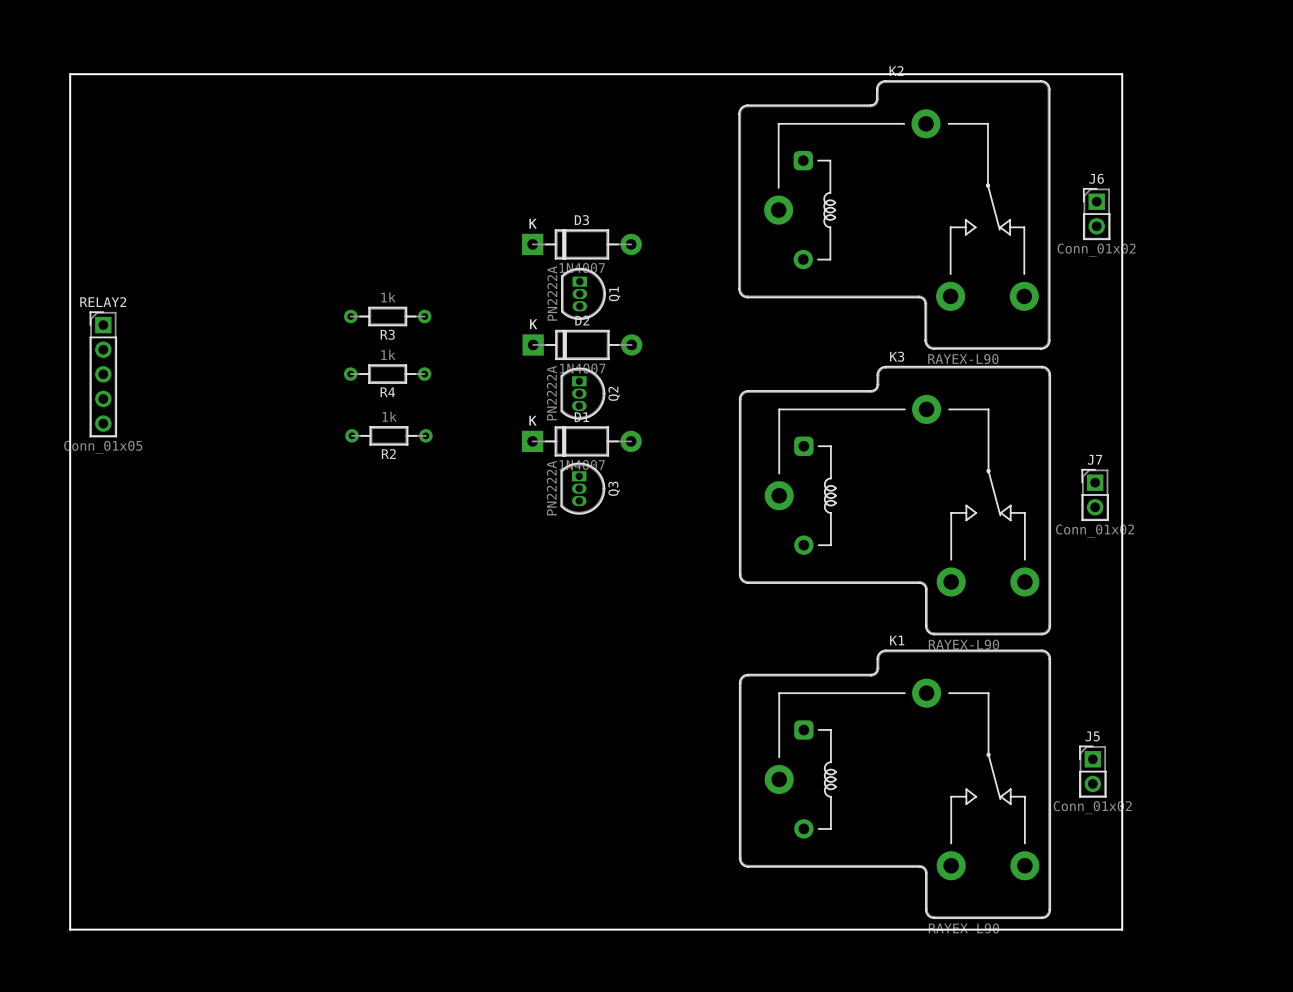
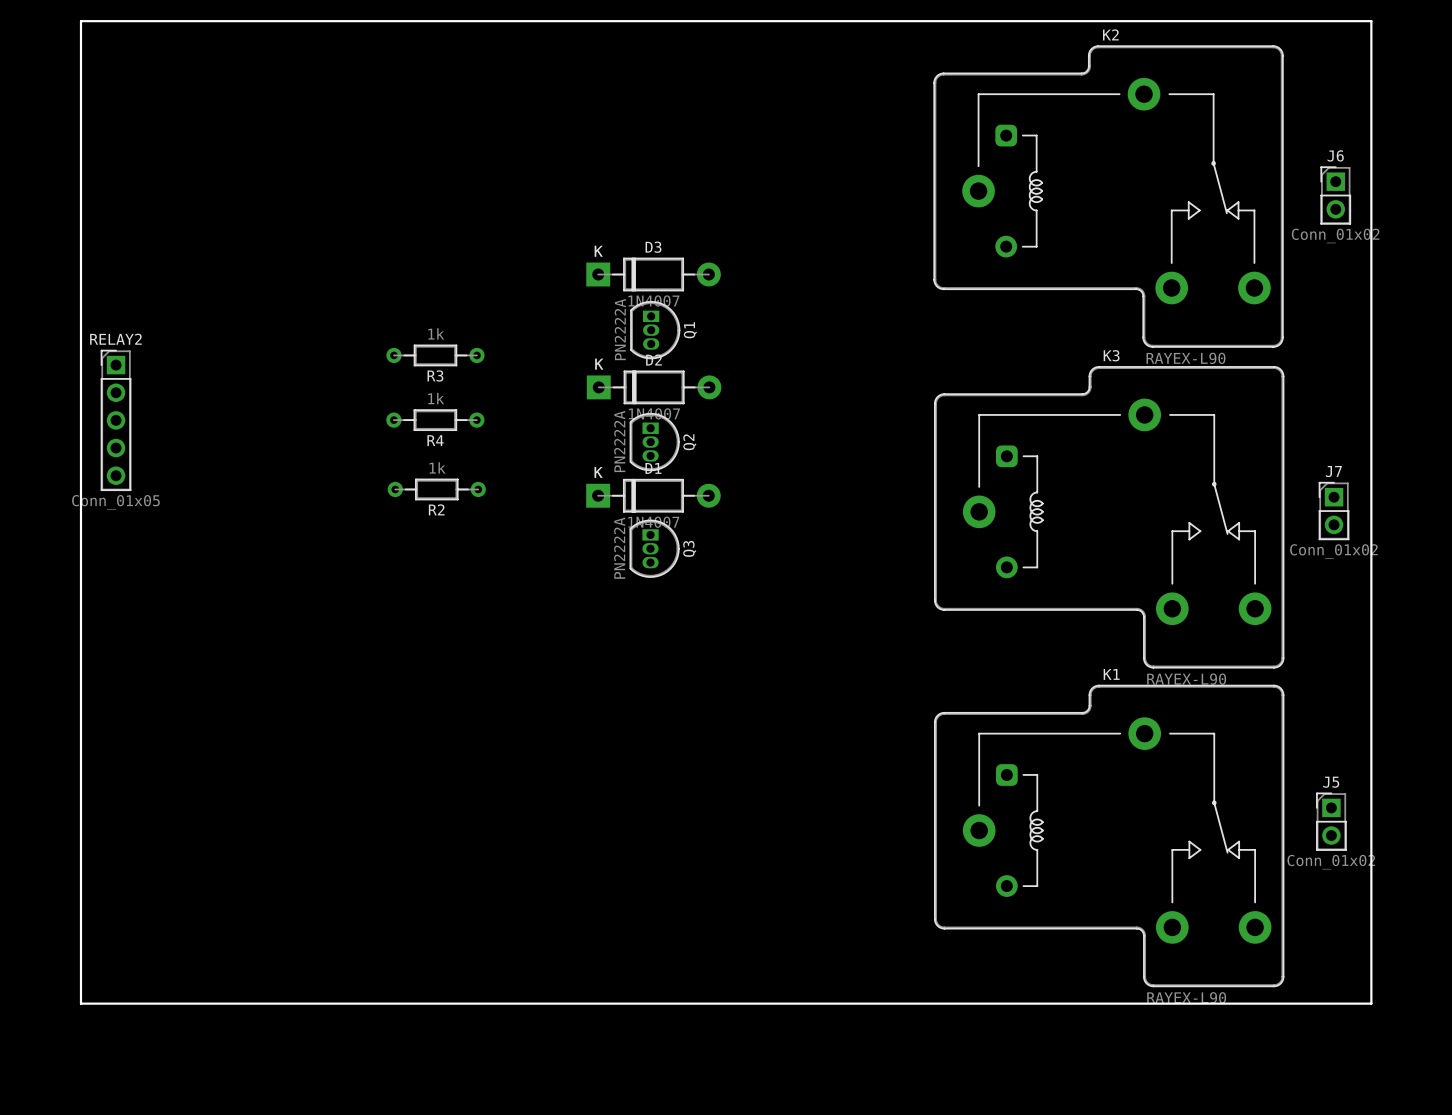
board edge: (70, 74) (1122, 74) (1122, 929) (70, 929) (70, 74) -> (80, 21) (80, 1003) (1371, 1003) (1371, 21) (80, 21)
K2 position: (894, 214) -> (1108, 196)
J6 position: (1096, 214) -> (1335, 195)
J7 position: (1095, 494) -> (1334, 511)
K3 position: (894, 500) -> (1109, 517)
J5 position: (1092, 771) -> (1331, 821)
K1 position: (894, 784) -> (1109, 835)

